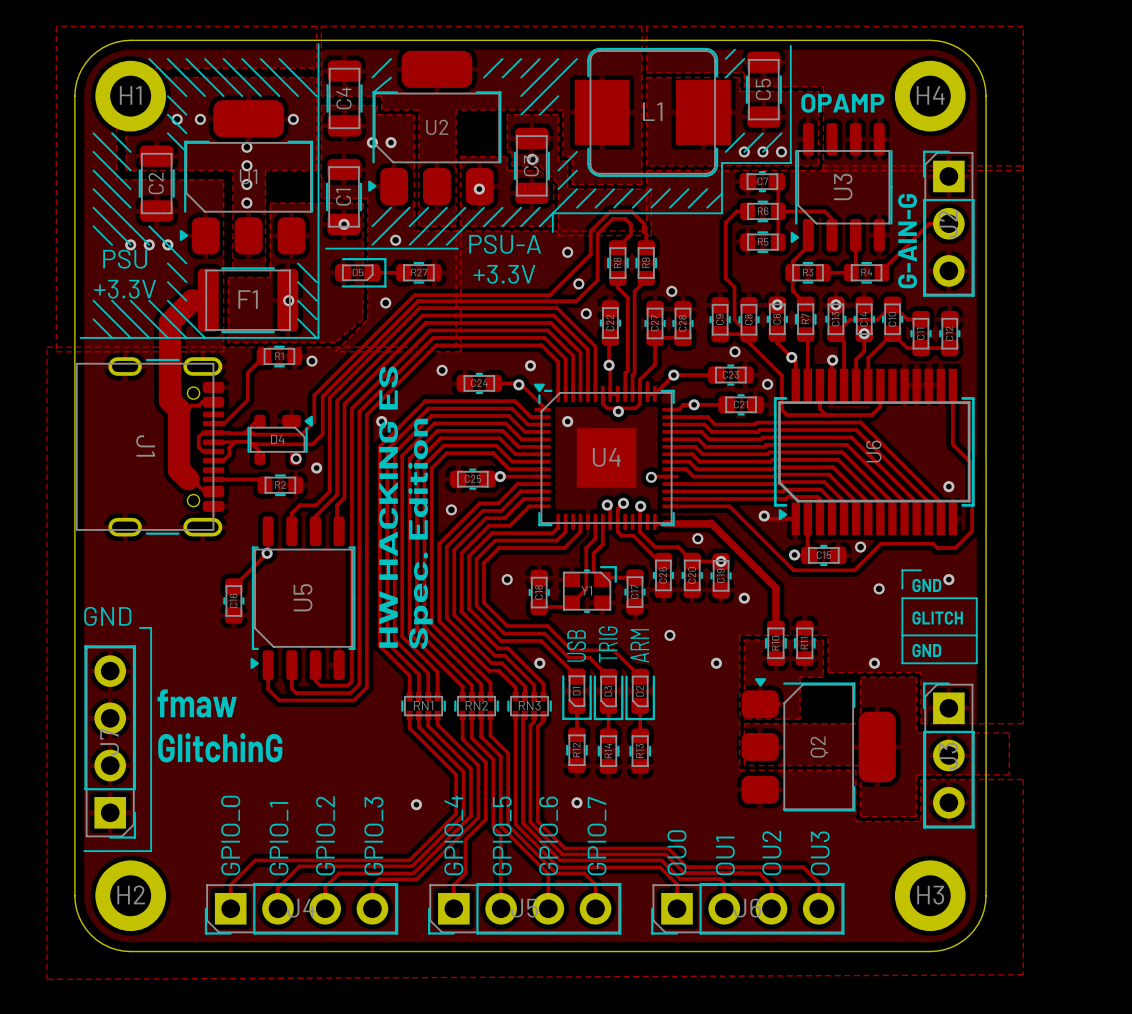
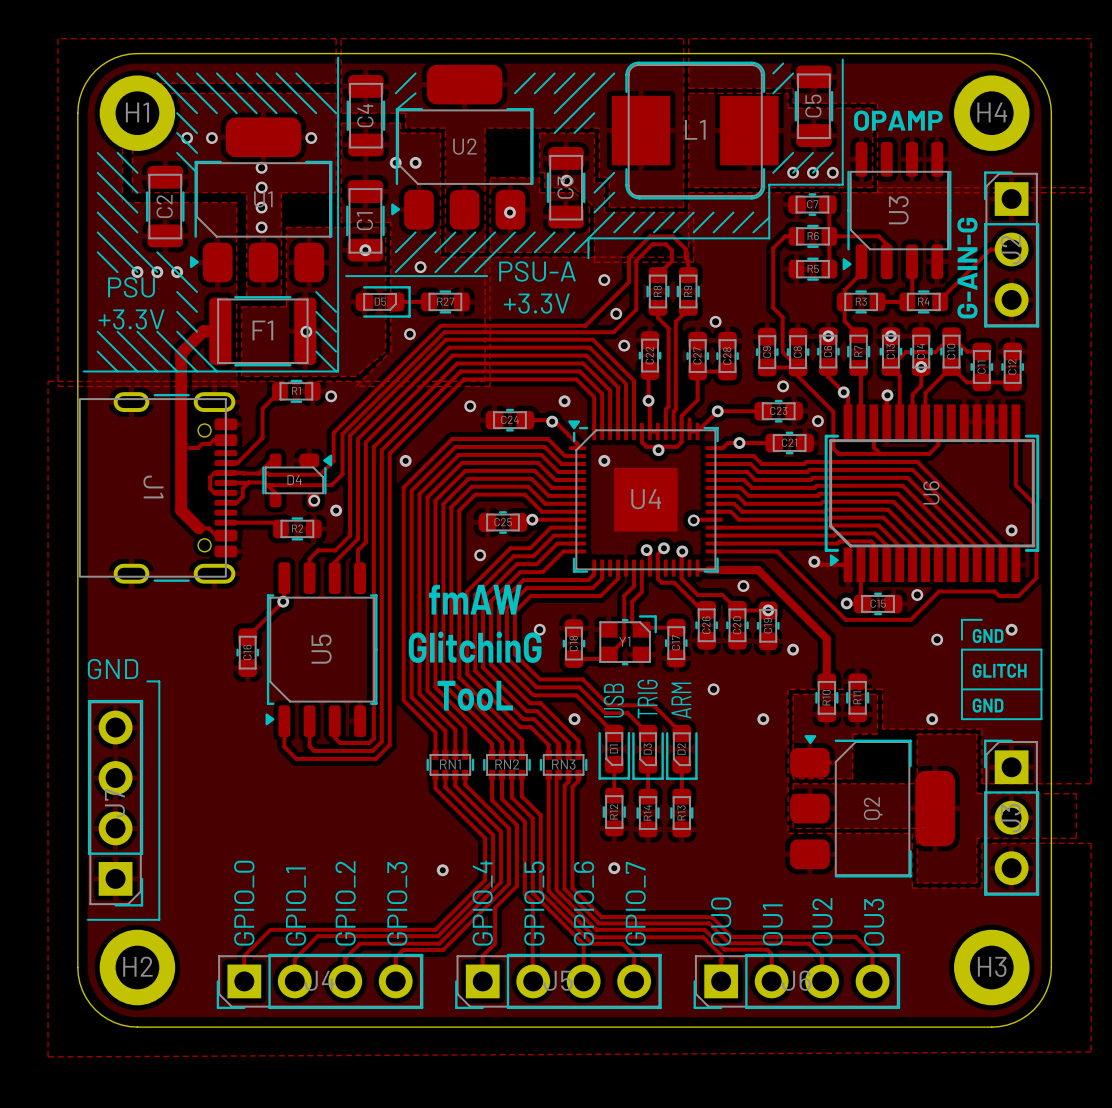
track width: thick (192, 300) (171, 321) -> thin (203, 331) (181, 353)
track: (171, 321) (169, 322) (169, 400) (179, 409) -> (181, 353) (181, 510) (199, 528) (208, 528)
track: (179, 409) (179, 469) (197, 484) -> none
text: HW HACKING ES (388, 507) -> none
text: Spec. Edition (420, 533) -> none
text: none -> fmAW (475, 599)
text: none -> TooL (475, 695)
text: fmaw (197, 703) -> none
text position: GlitchinG (220, 747) -> GlitchinG (475, 647)

